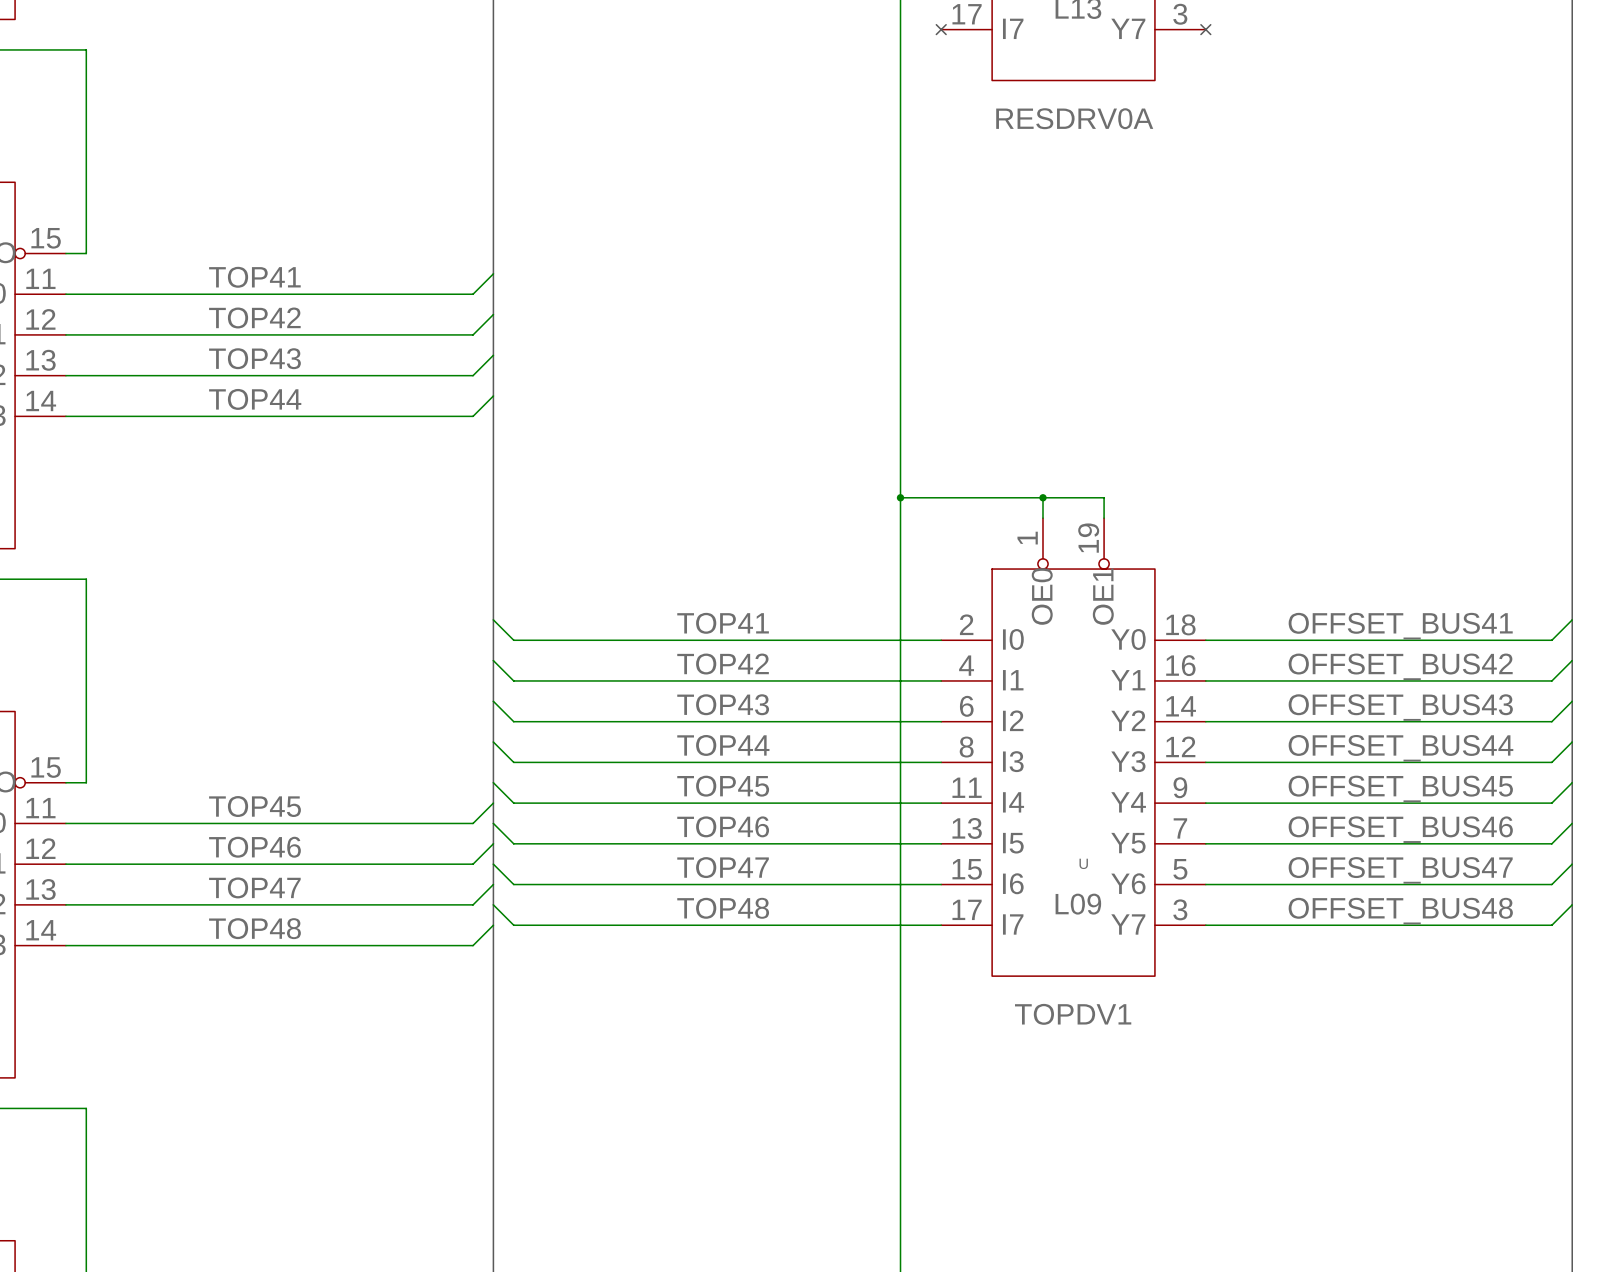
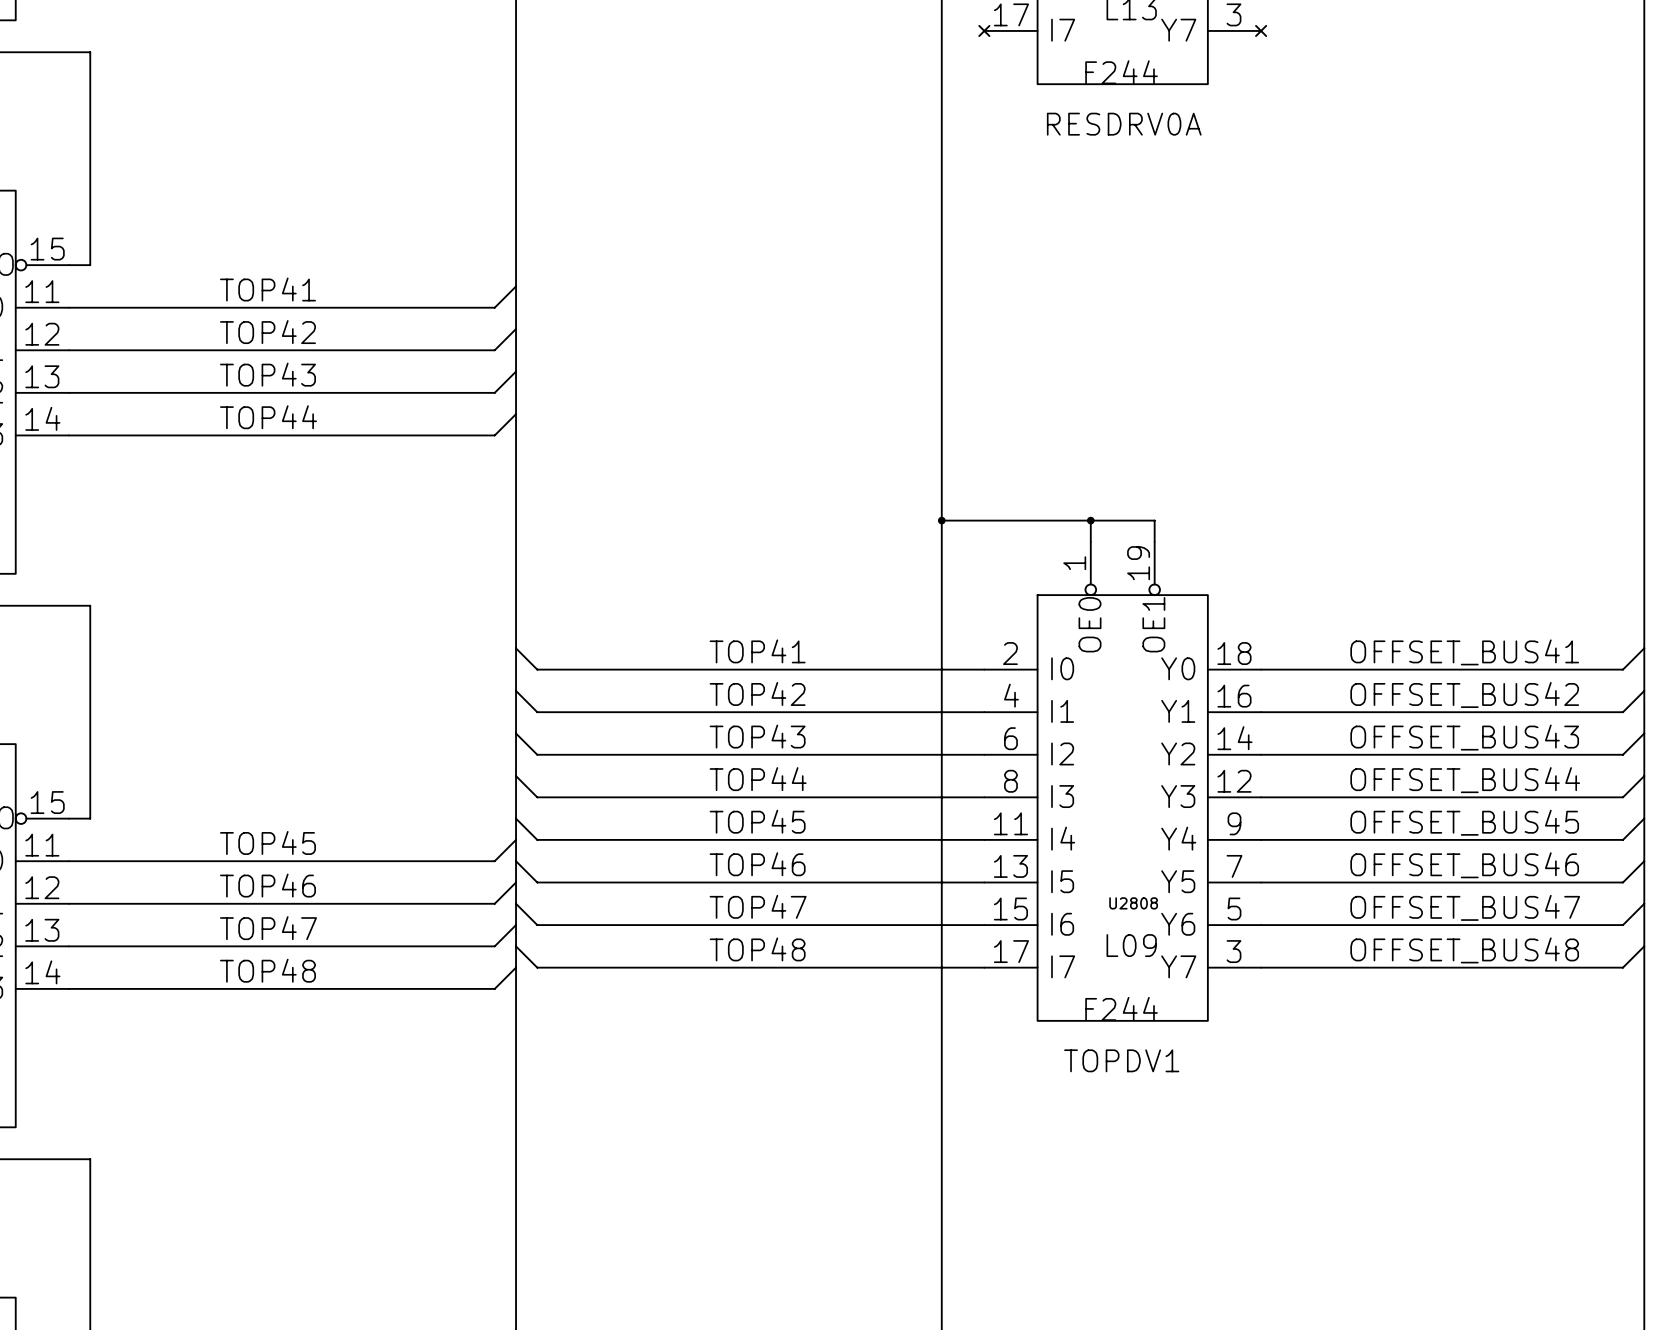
part value: none -> F244 (1121, 72)
U name: U (1083, 863) -> U2808 (1133, 903)
U value: none -> F244 (1121, 1008)

